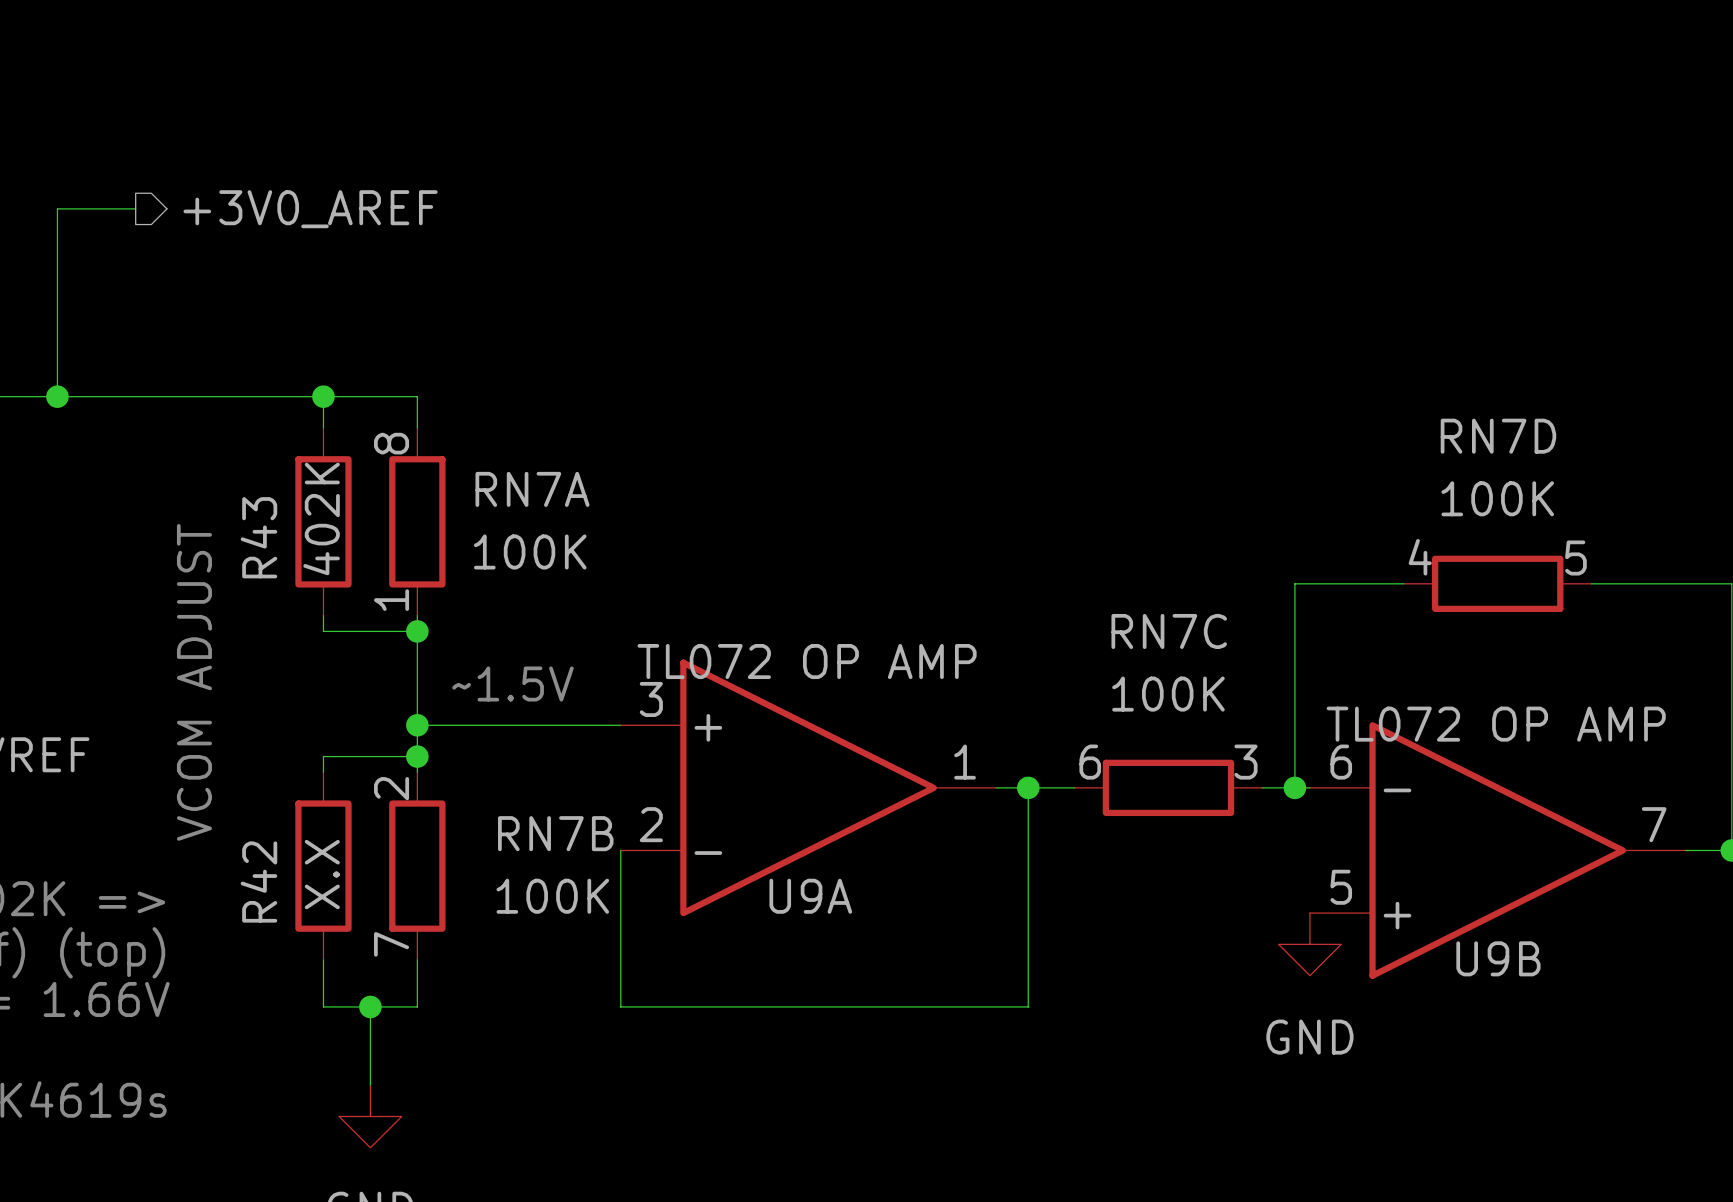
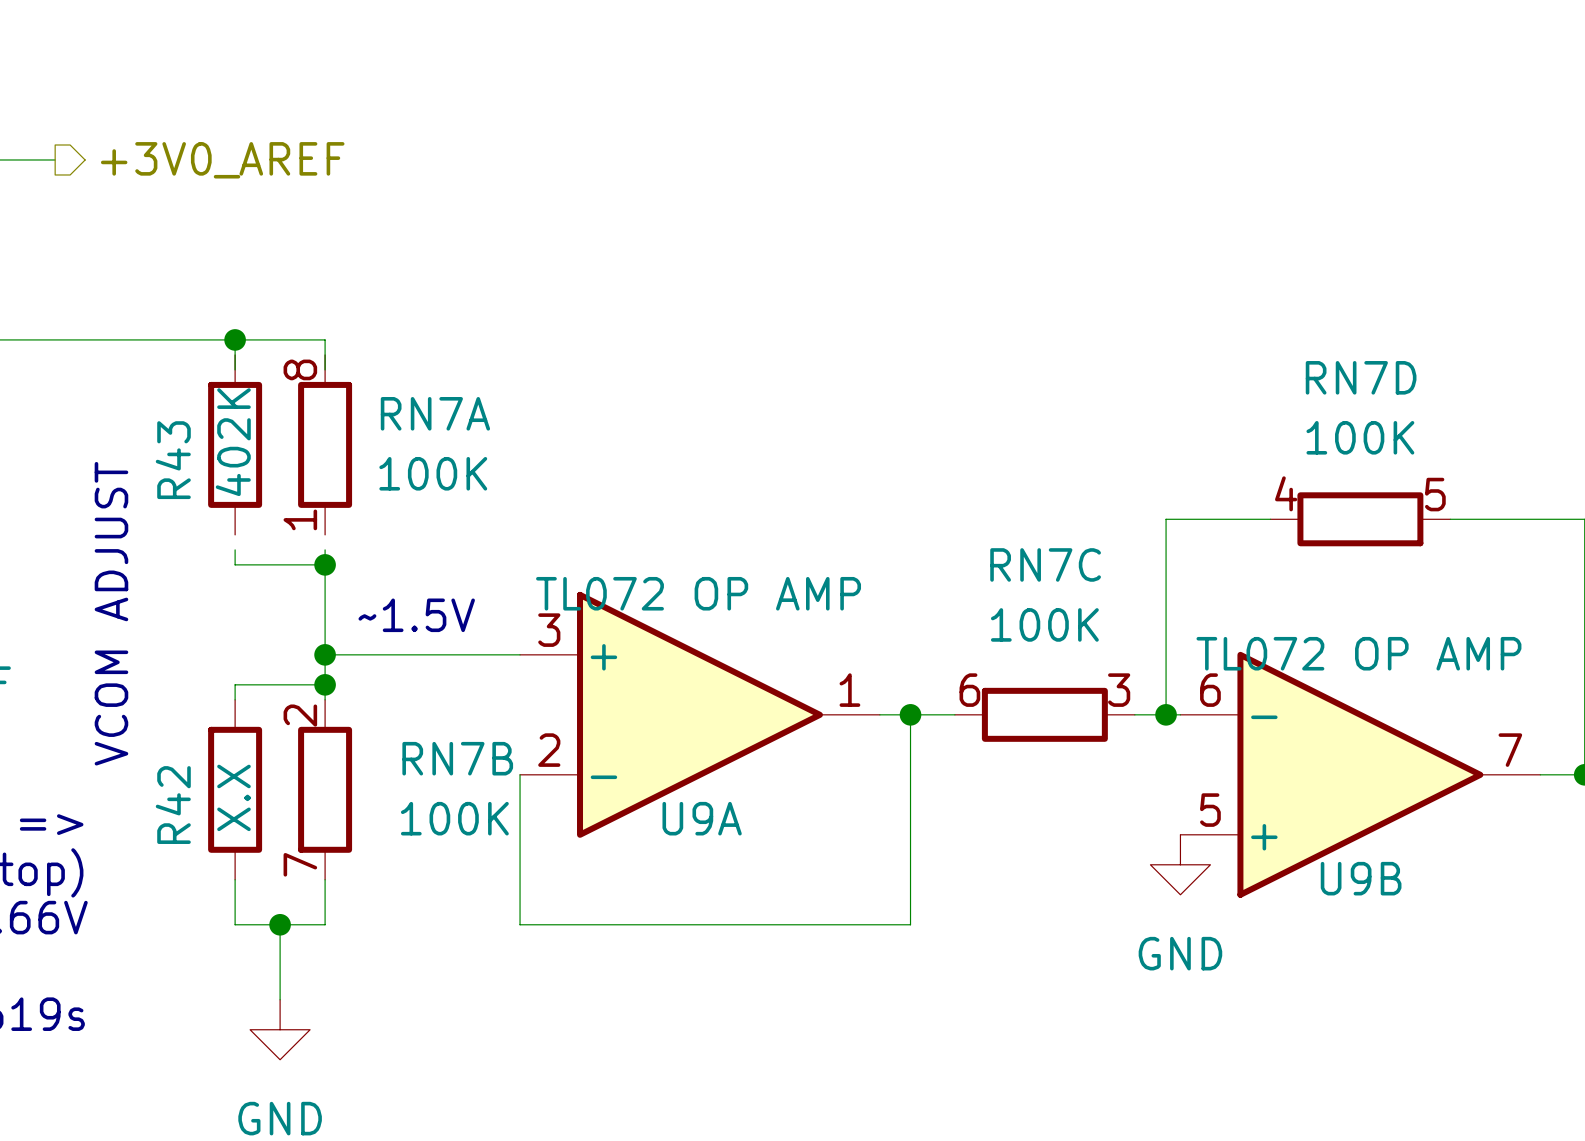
R43 position: (323, 521) -> (235, 444)
RN7A position: (417, 521) -> (325, 444)

